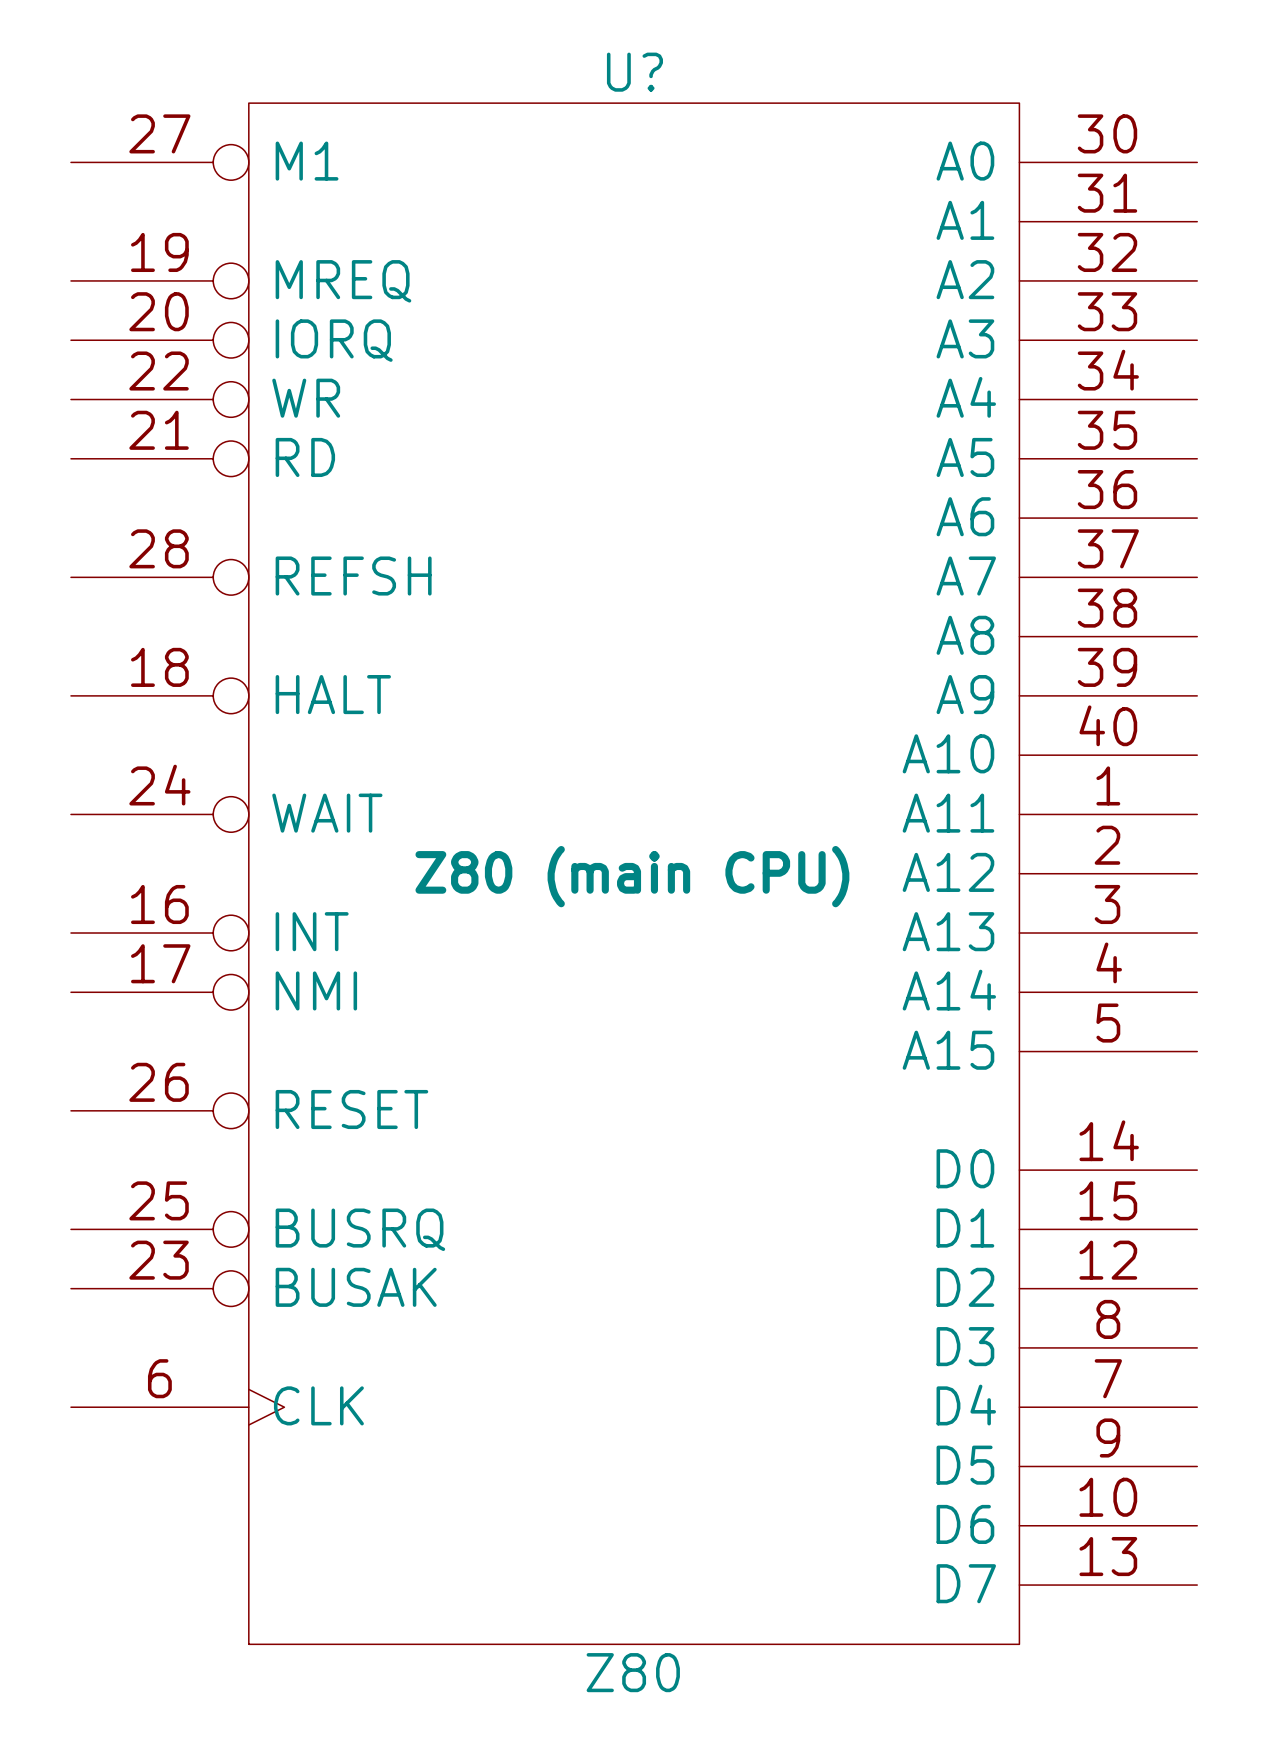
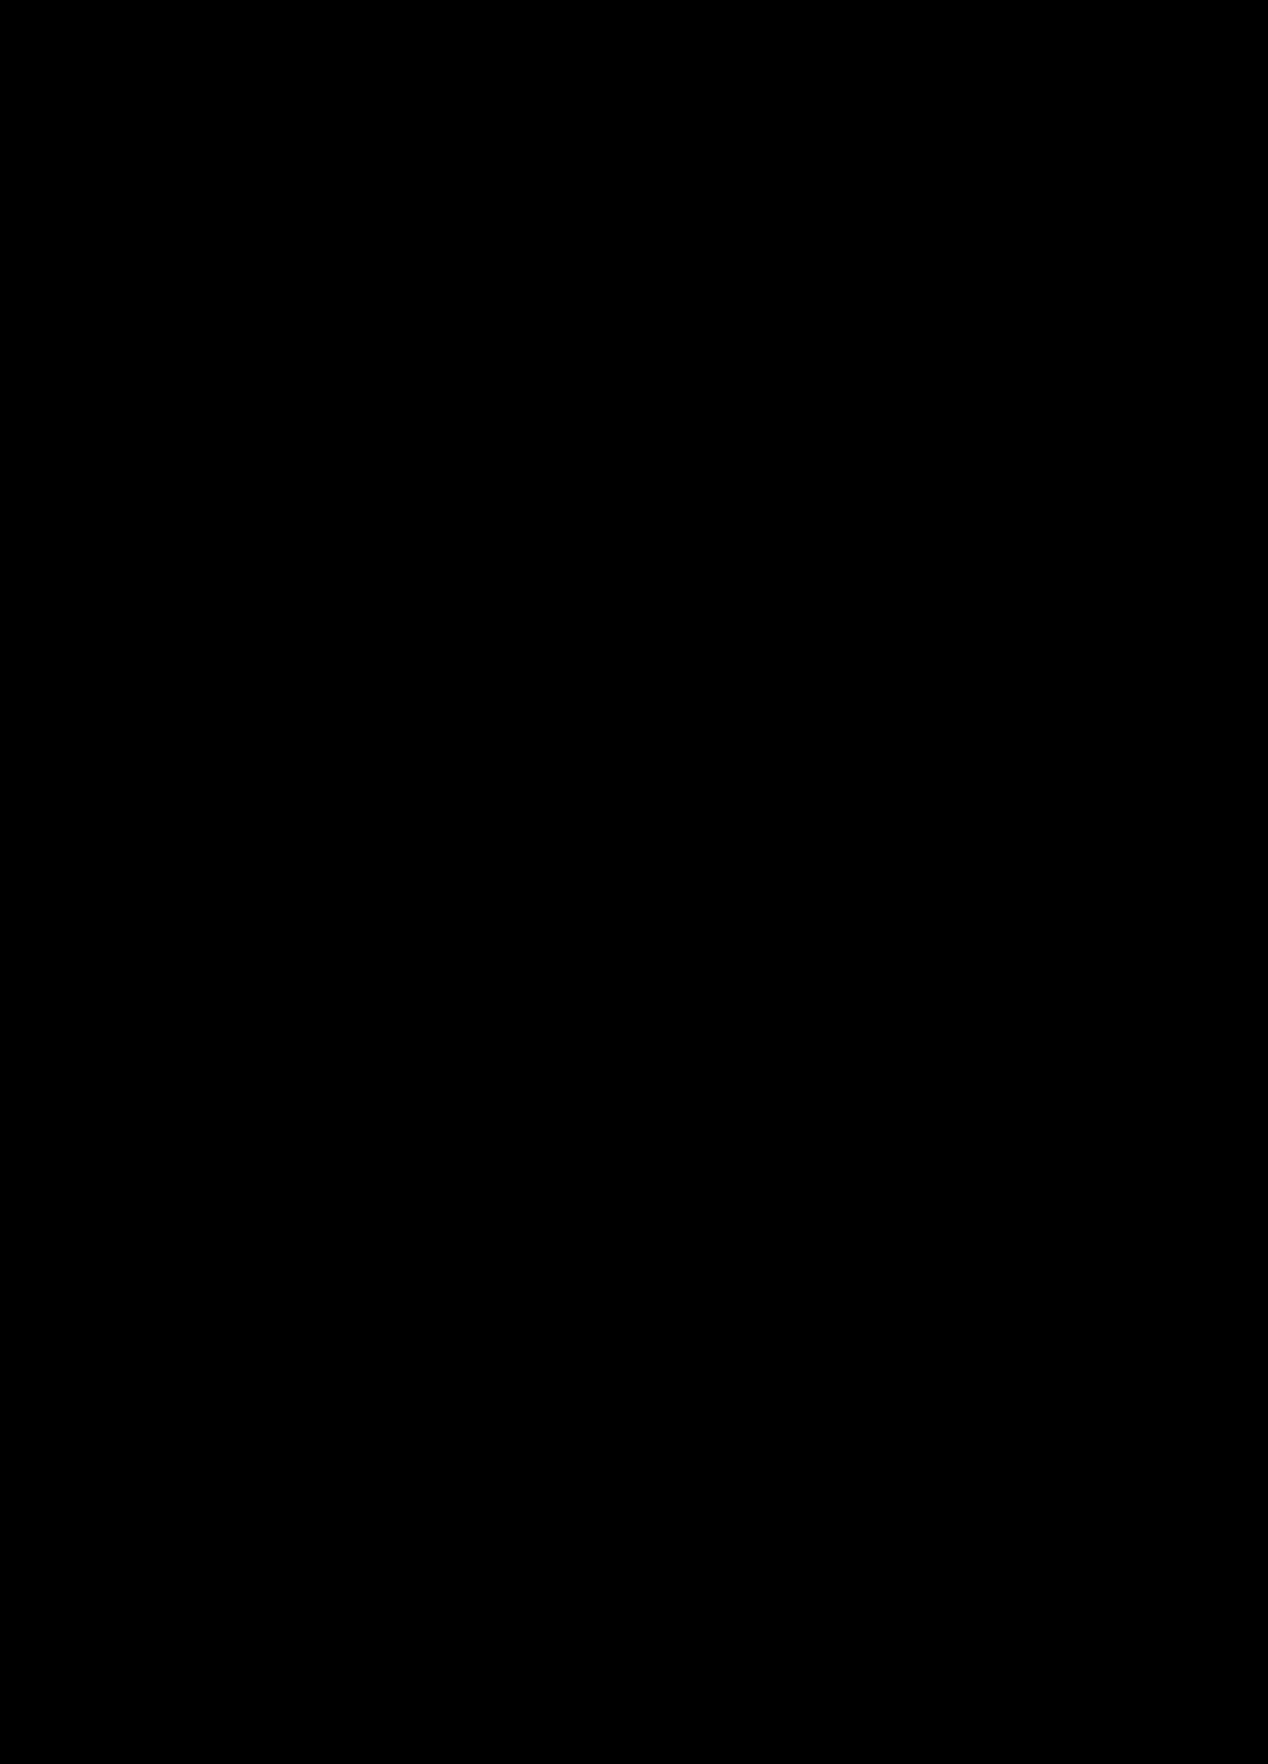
U?: Z80 (634, 873) -> none

